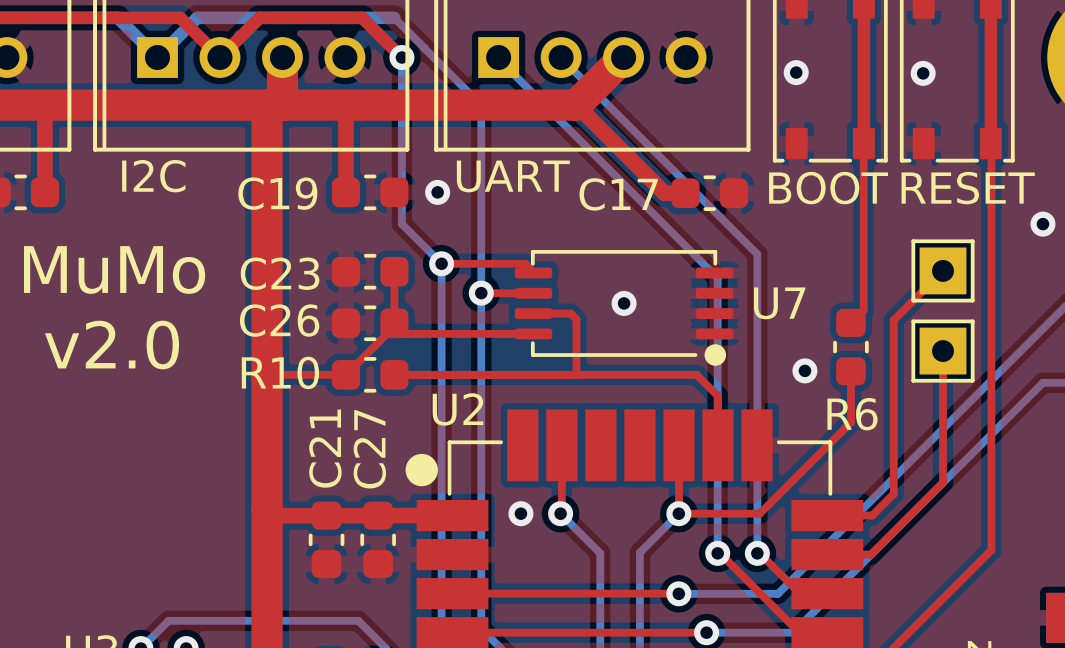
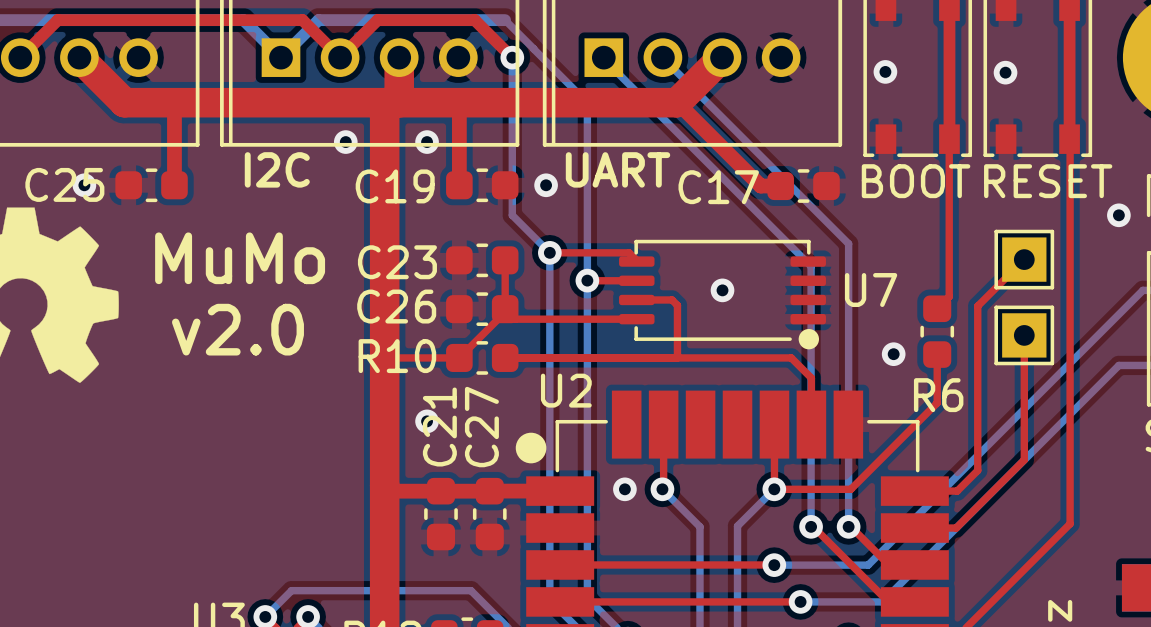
via: none -> (345, 142)
via: none -> (427, 142)
via: none -> (427, 421)

